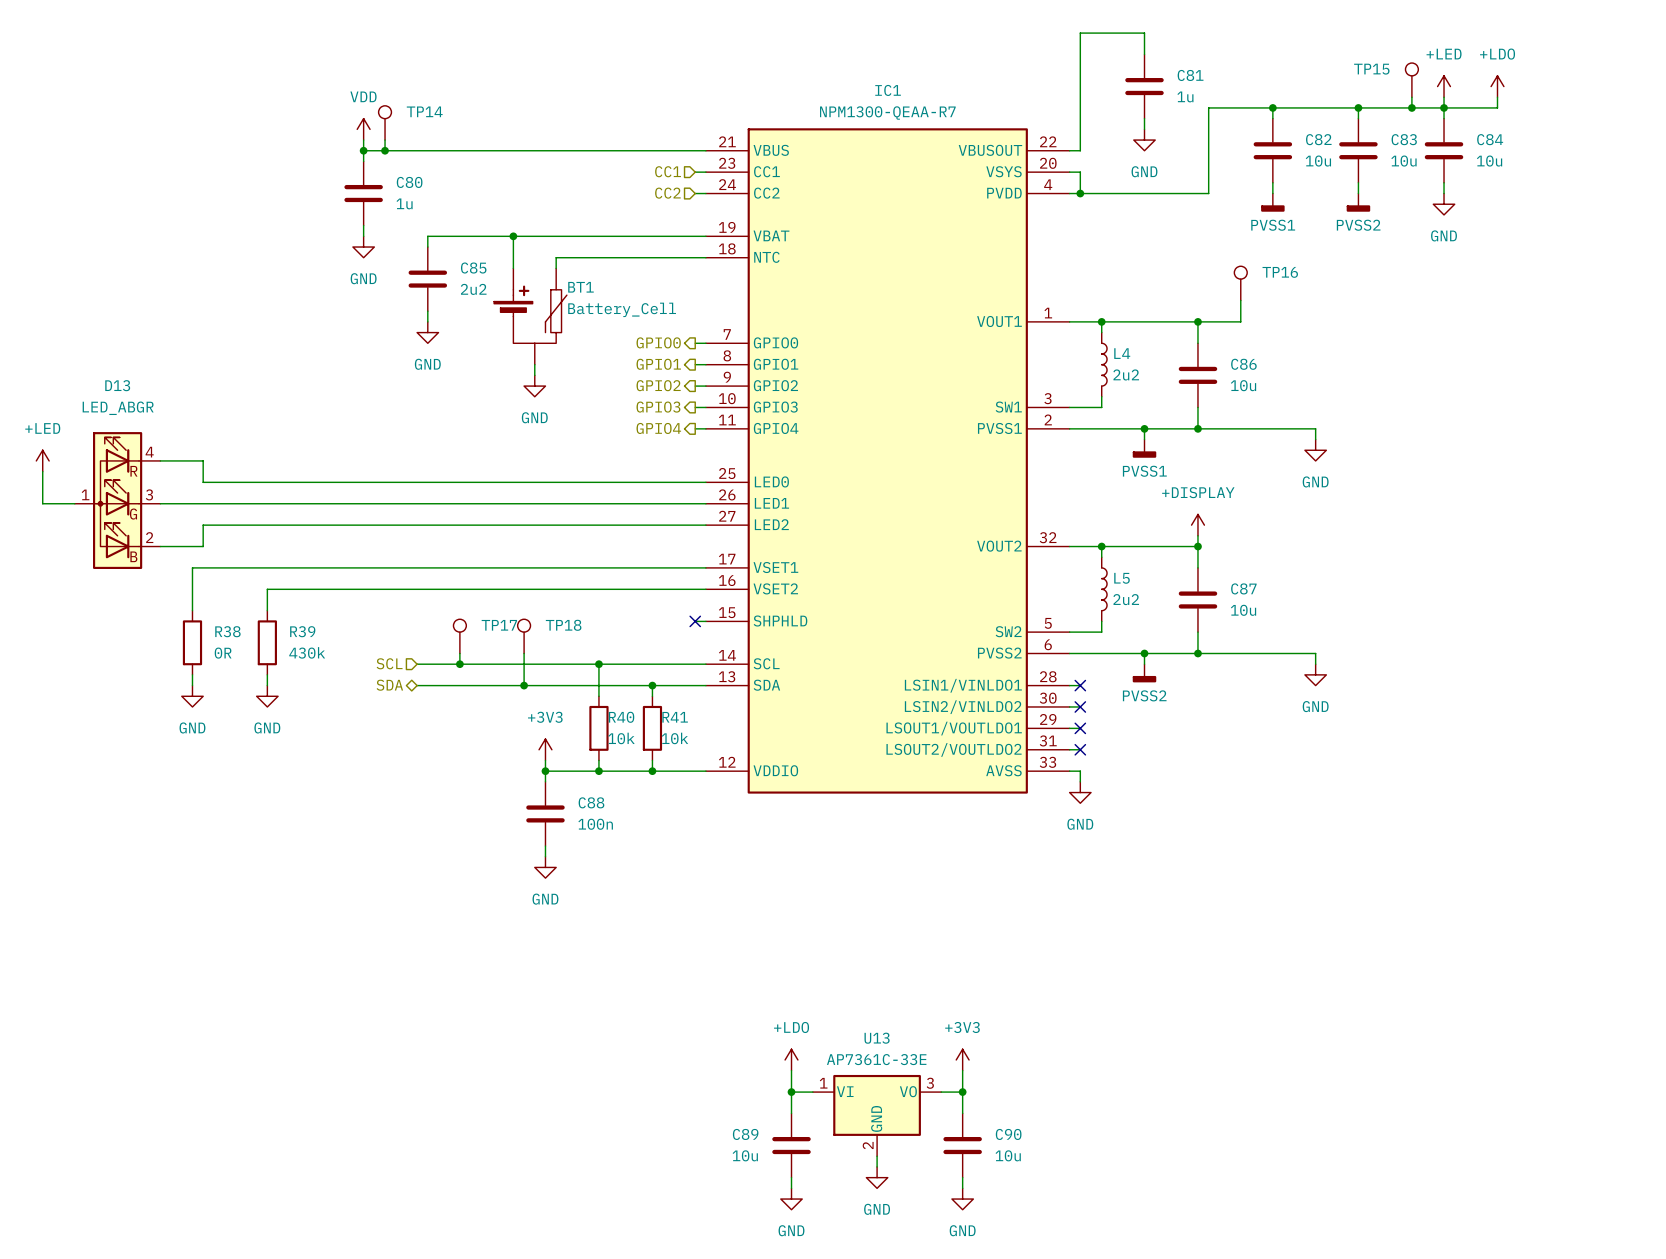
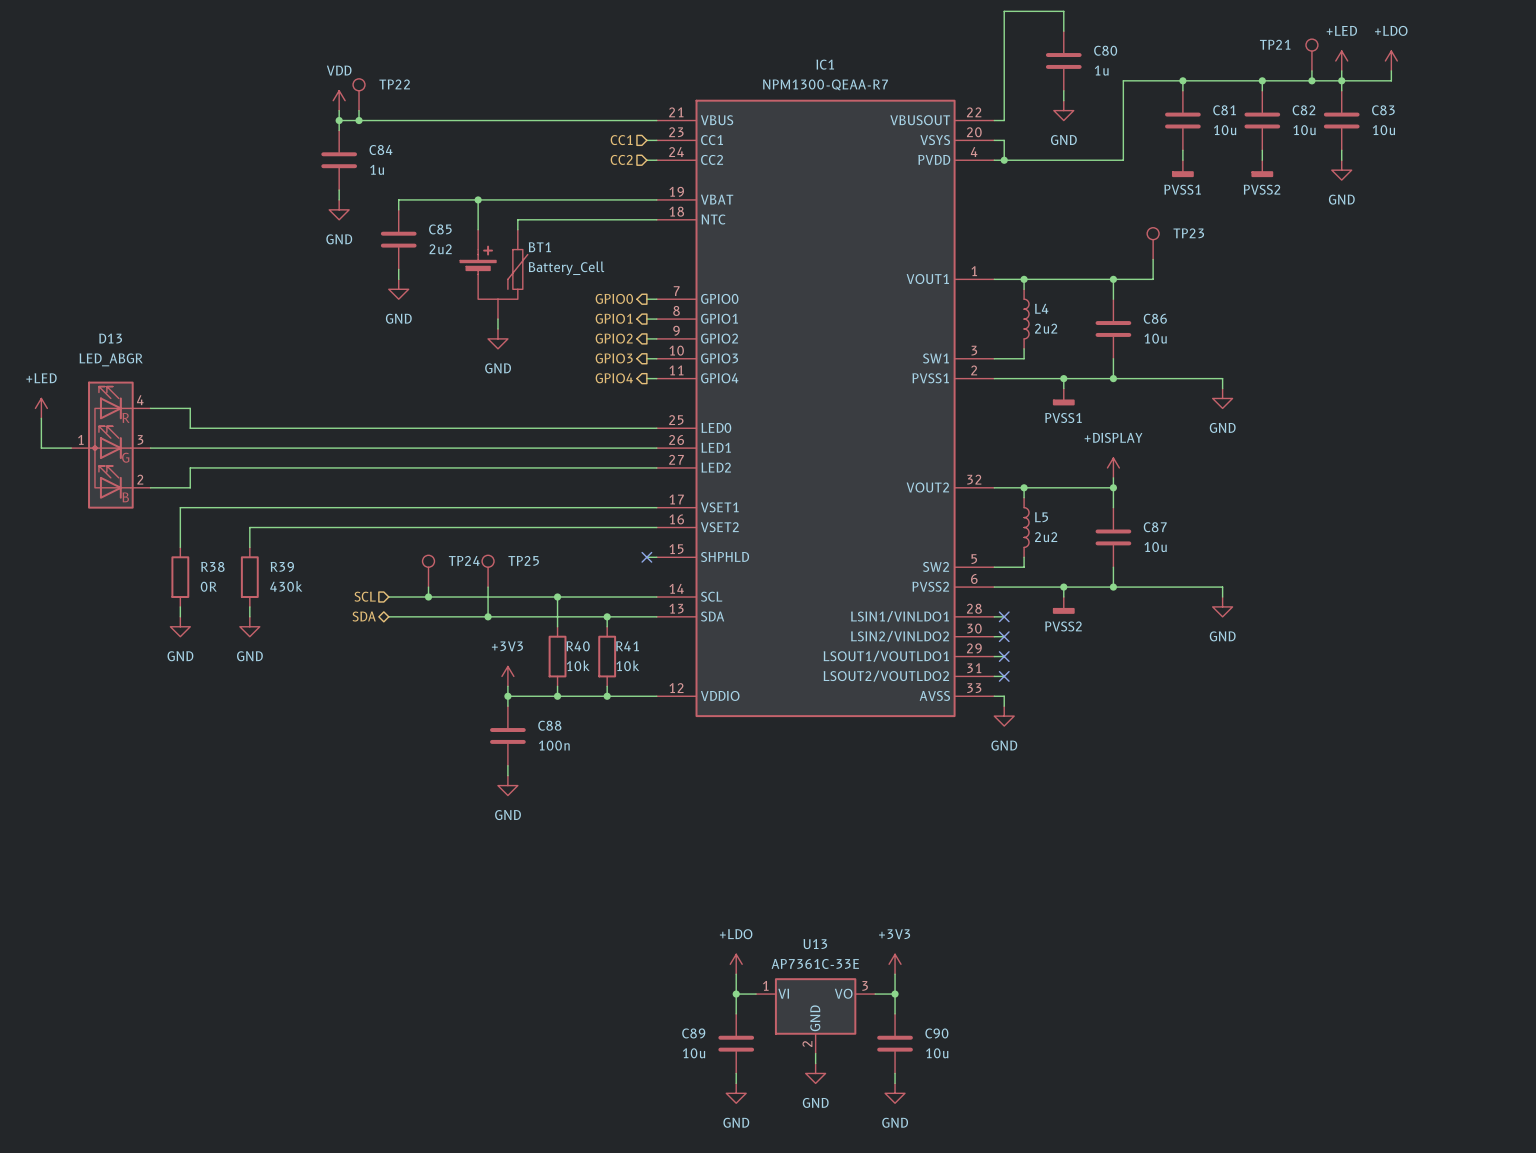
TP15 name: TP15 (1371, 69) -> TP21 (1275, 44)
C81 name: C81 (1190, 75) -> C80 (1105, 50)
TP14 name: TP14 (424, 111) -> TP22 (394, 84)
C82 name: C82 (1318, 139) -> C81 (1224, 110)
C83 name: C83 (1404, 139) -> C82 (1303, 110)
C84 name: C84 (1490, 139) -> C83 (1383, 110)
C80 name: C80 (409, 182) -> C84 (380, 150)
TP16 name: TP16 (1280, 272) -> TP23 (1188, 233)
TP17 name: TP17 (499, 625) -> TP24 (464, 560)
TP18 name: TP18 (563, 625) -> TP25 (523, 560)

